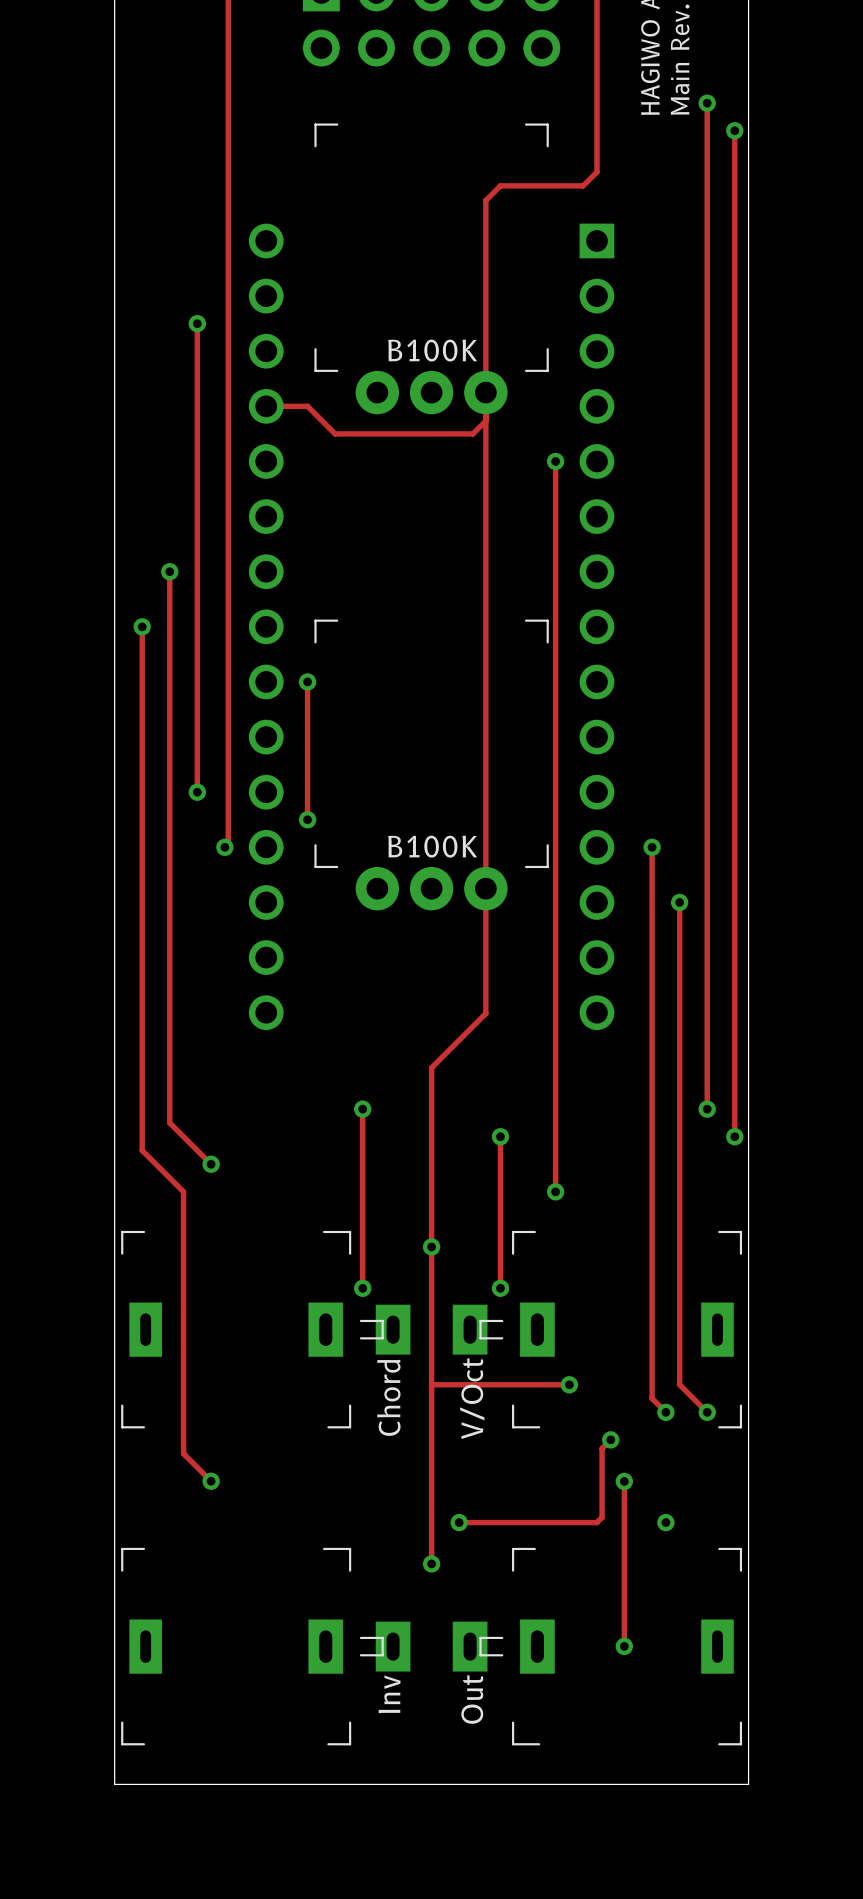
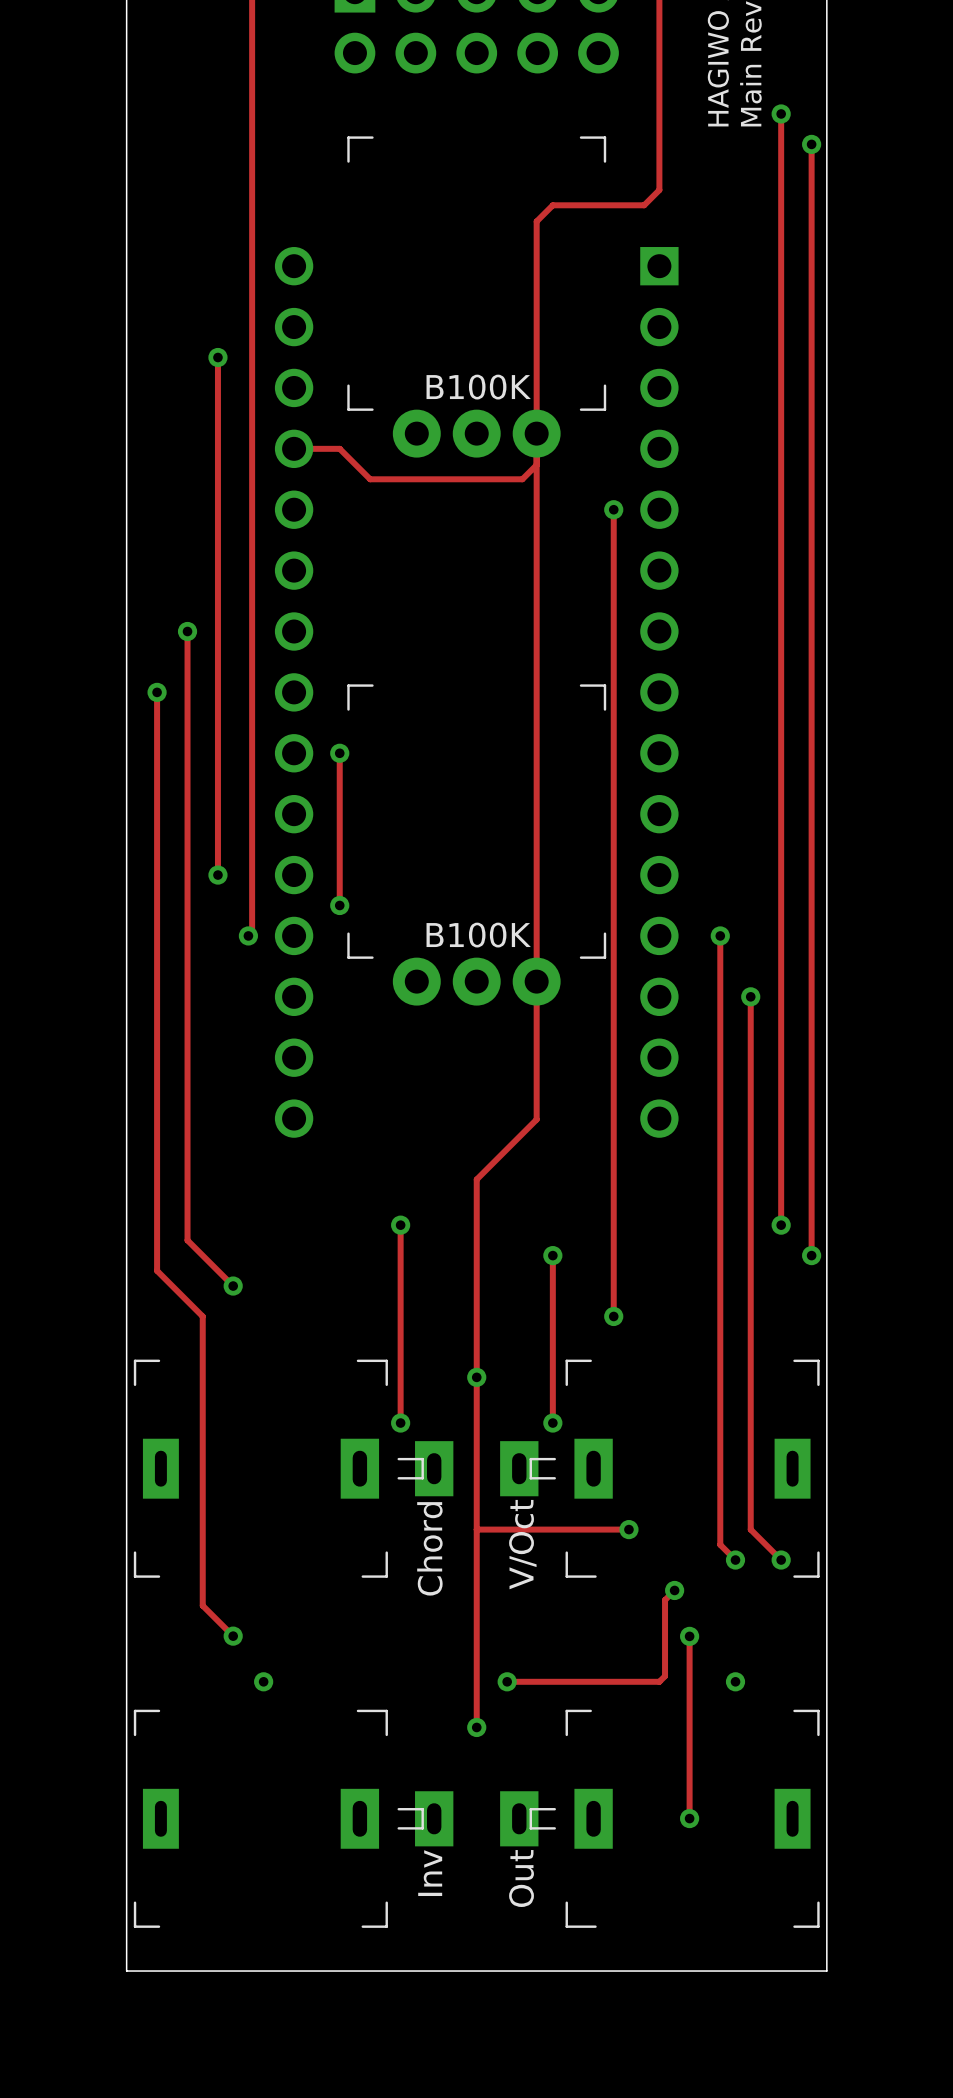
via: none -> (263, 1681)

